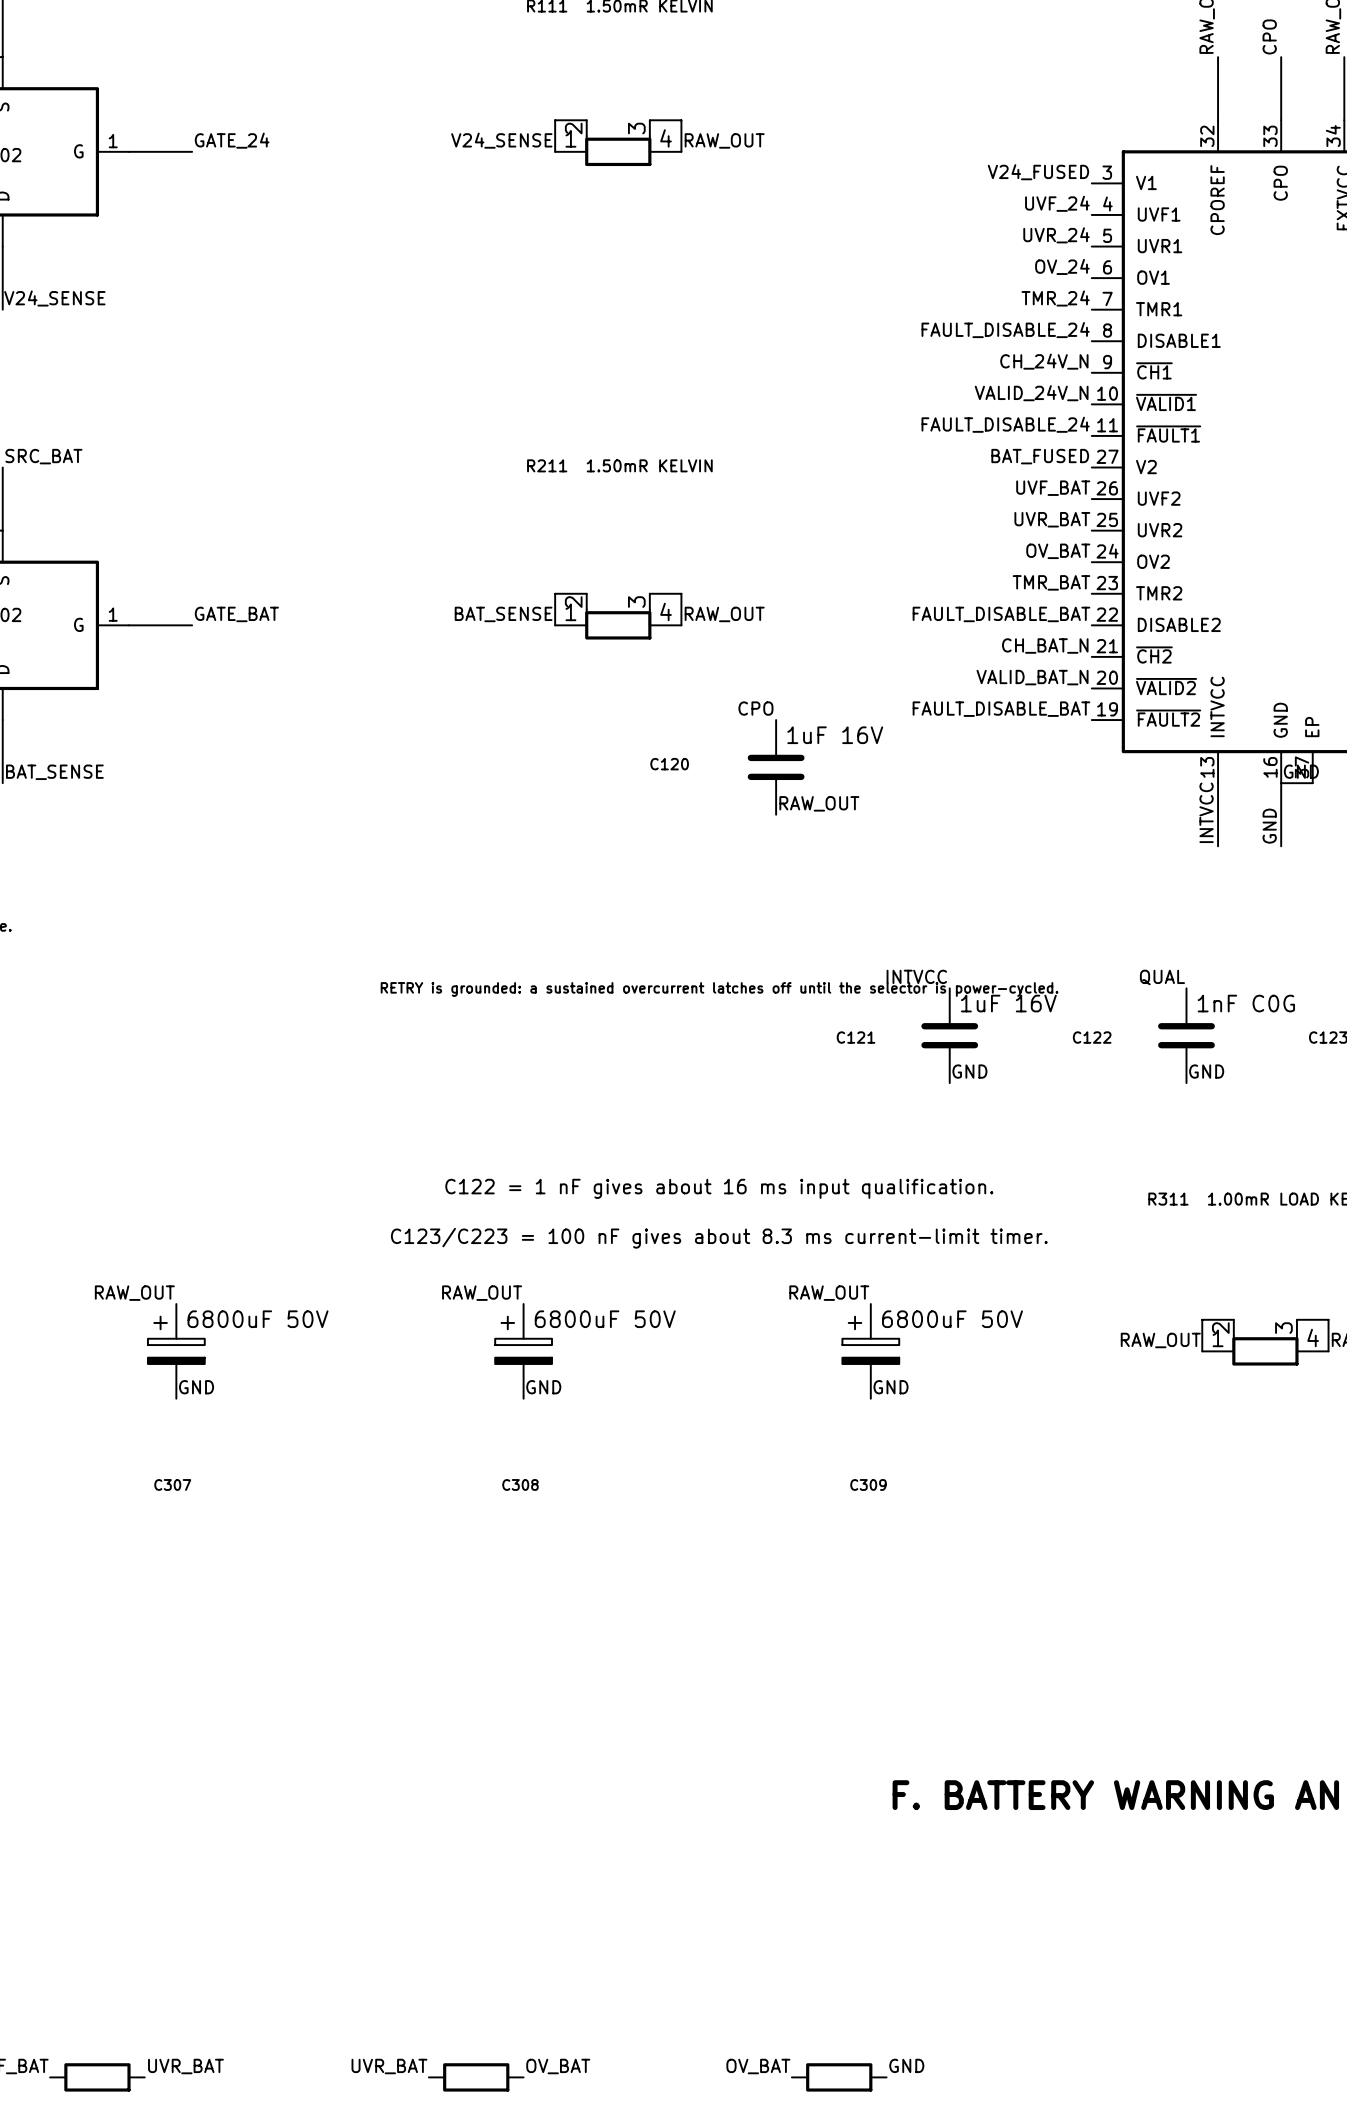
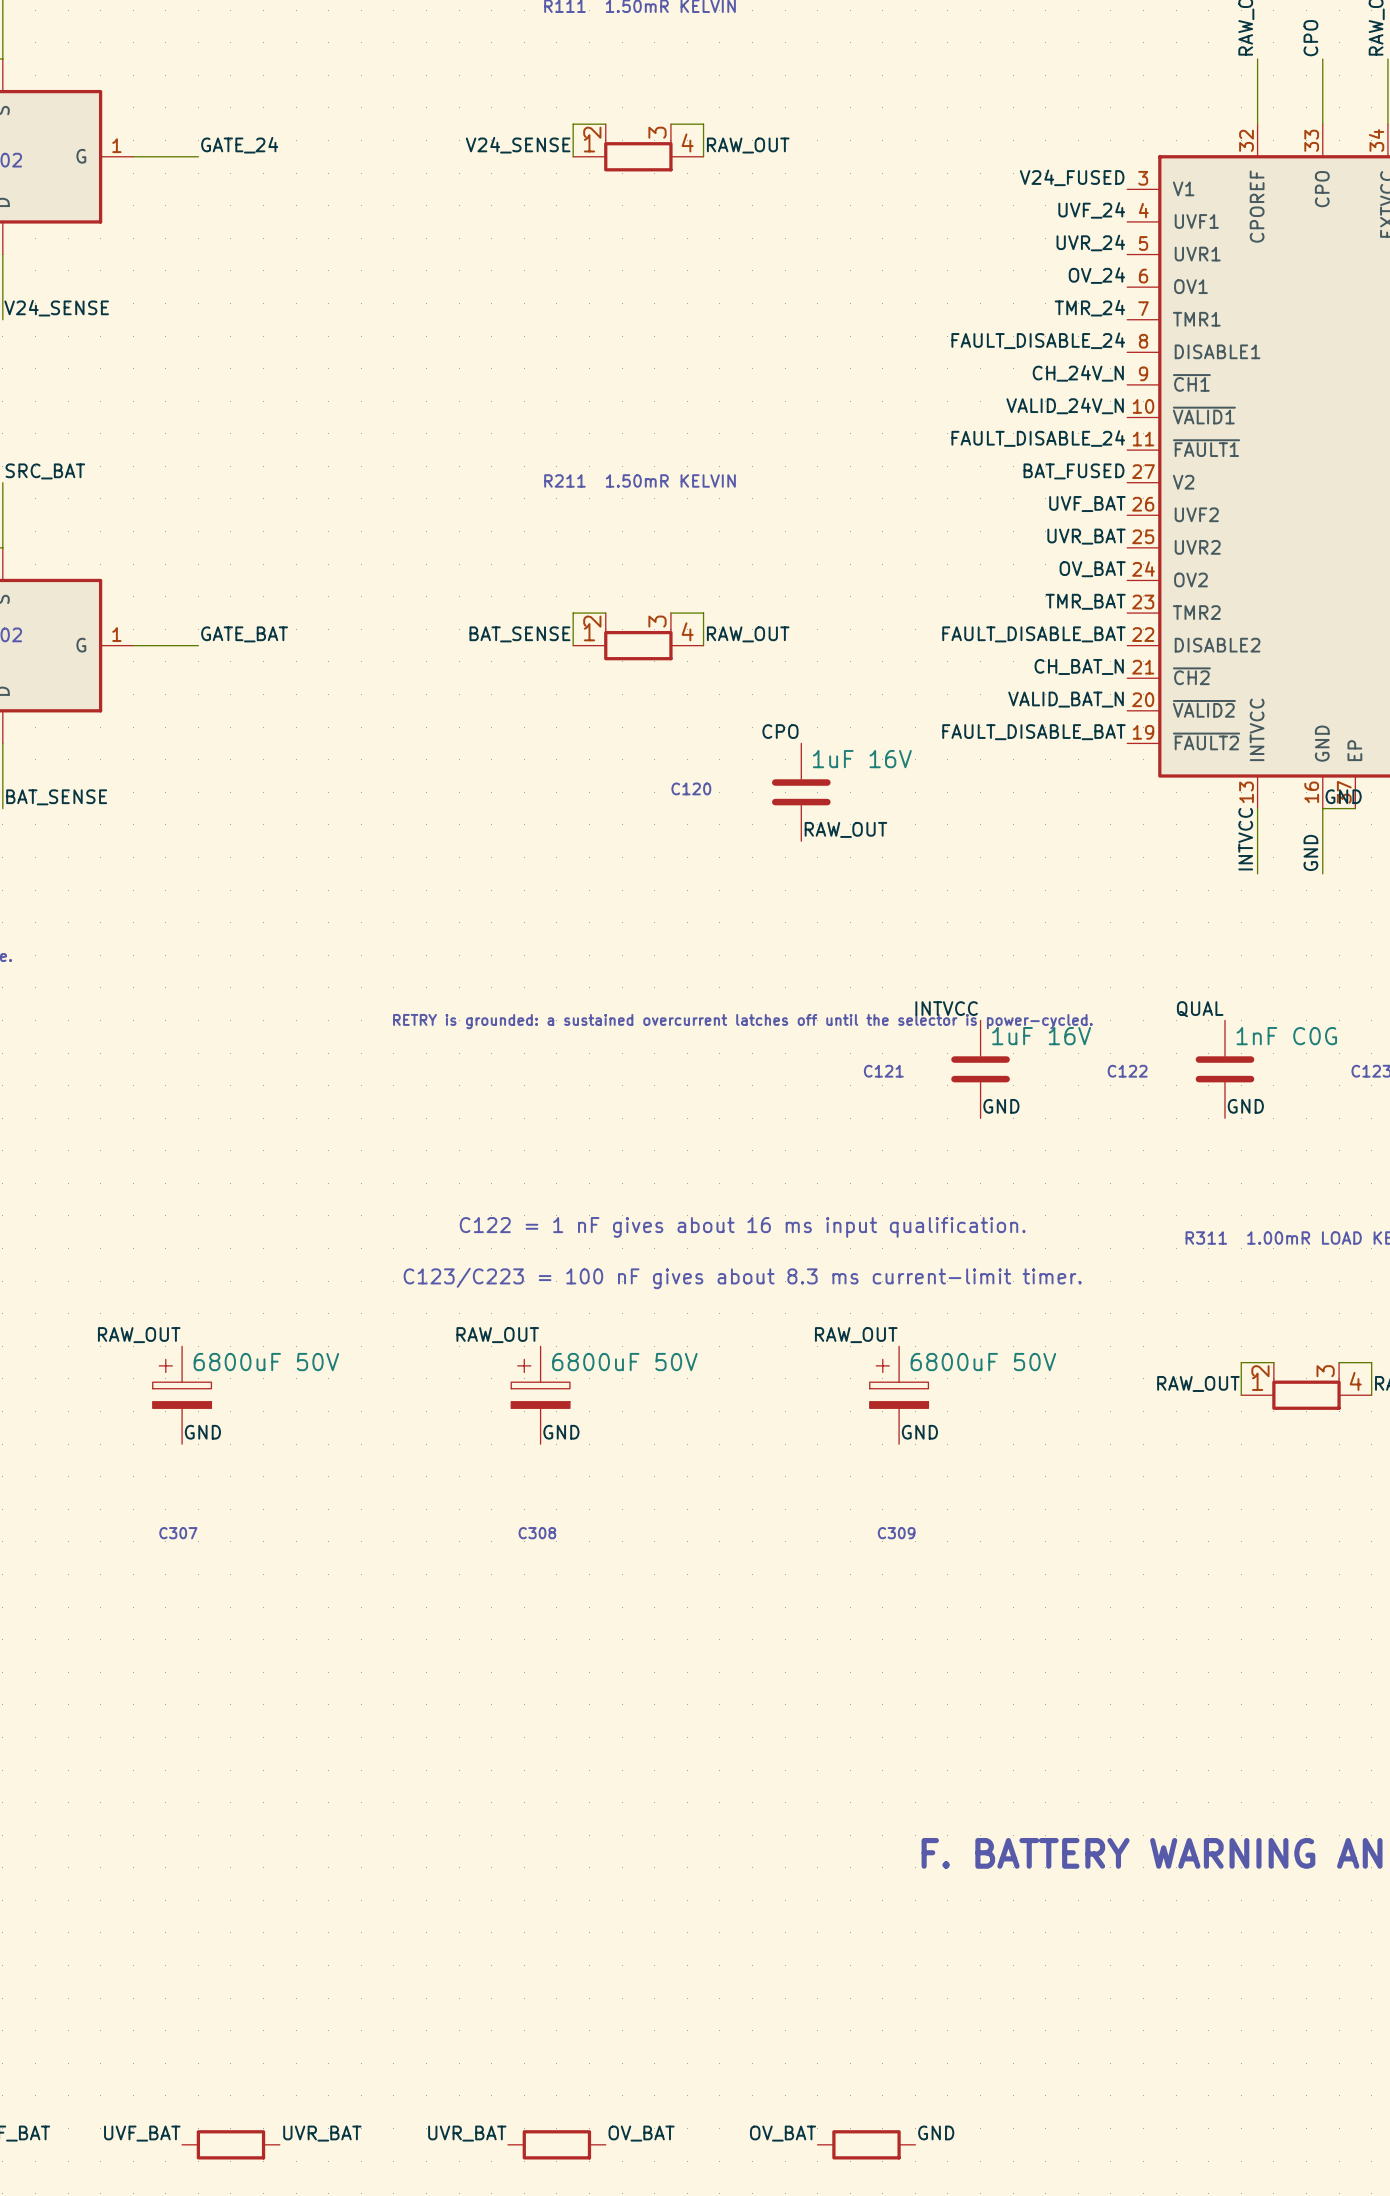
label: UVR_BAT (185, 2066) -> UVF_BAT (142, 2133)
label: none -> UVR_BAT (322, 2133)
label position: UVR_BAT (389, 2066) -> UVR_BAT (467, 2133)
label position: OV_BAT (558, 2066) -> OV_BAT (641, 2133)
part: (97, 2077) -> none
part: none -> (230, 2144)
part position: (476, 2077) -> (556, 2144)

